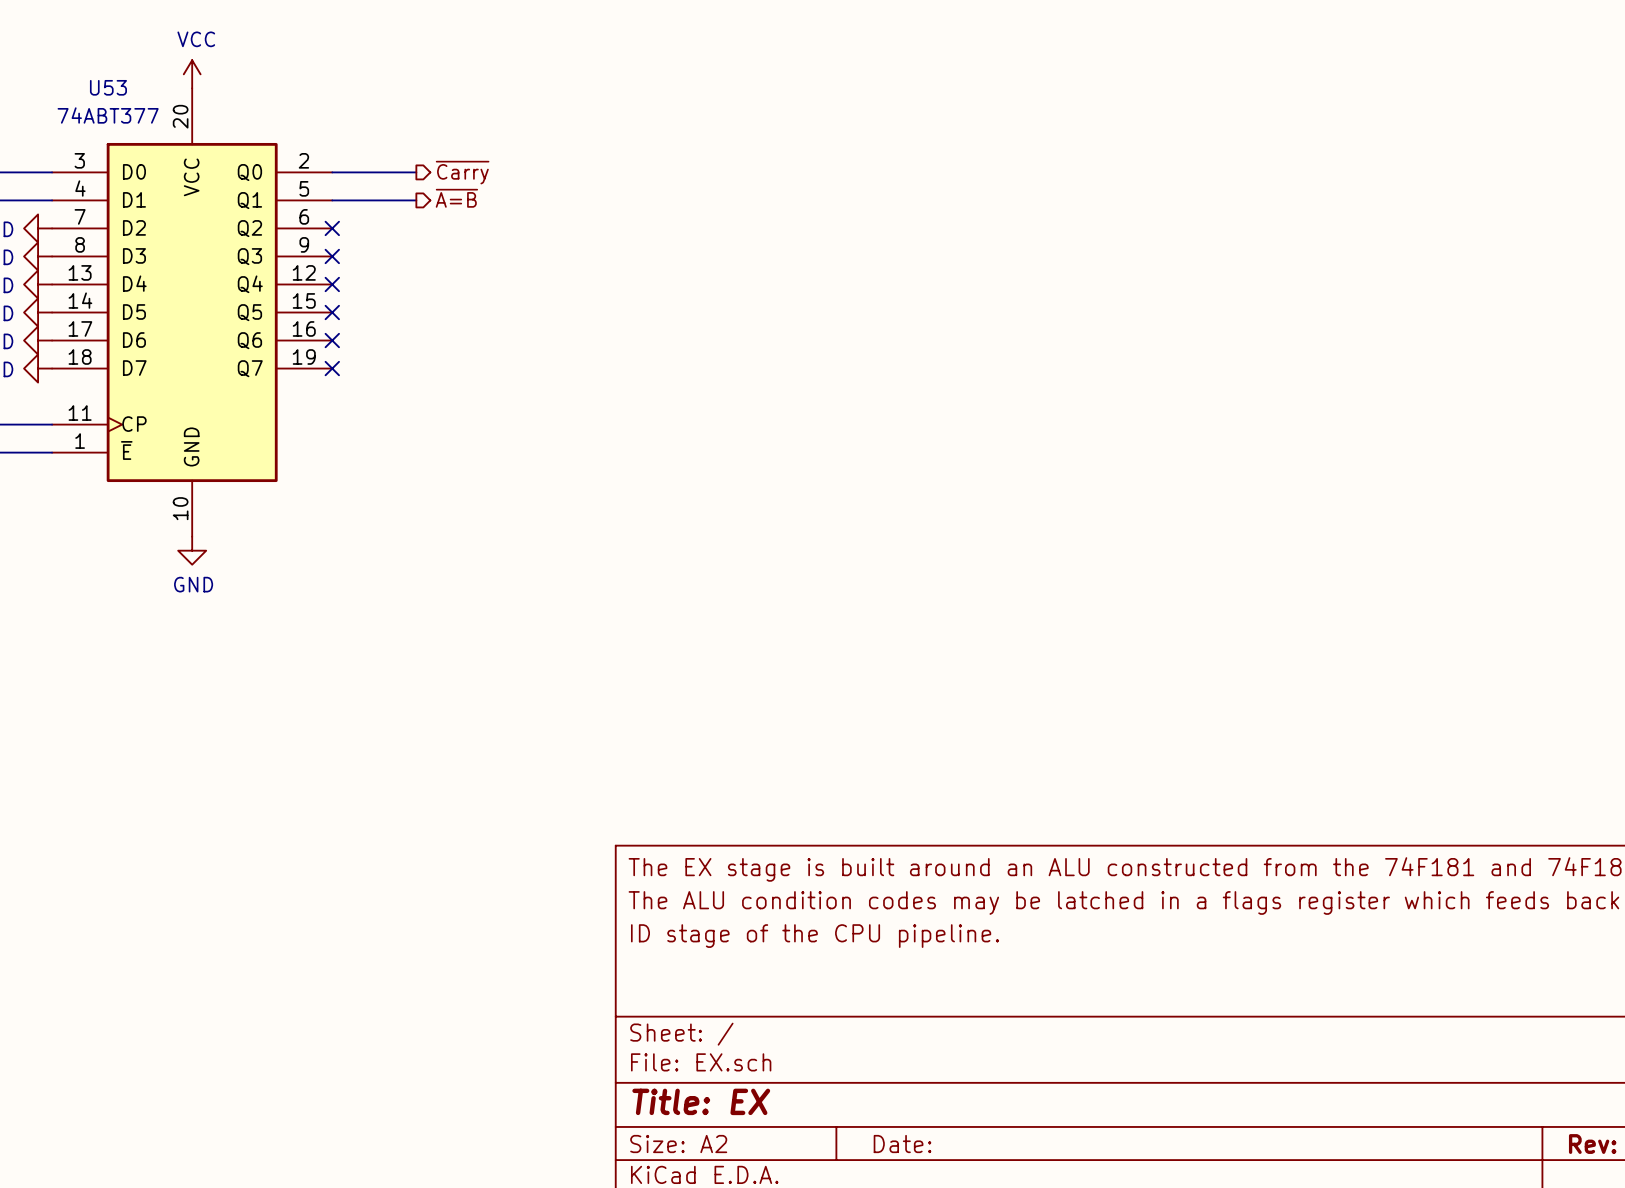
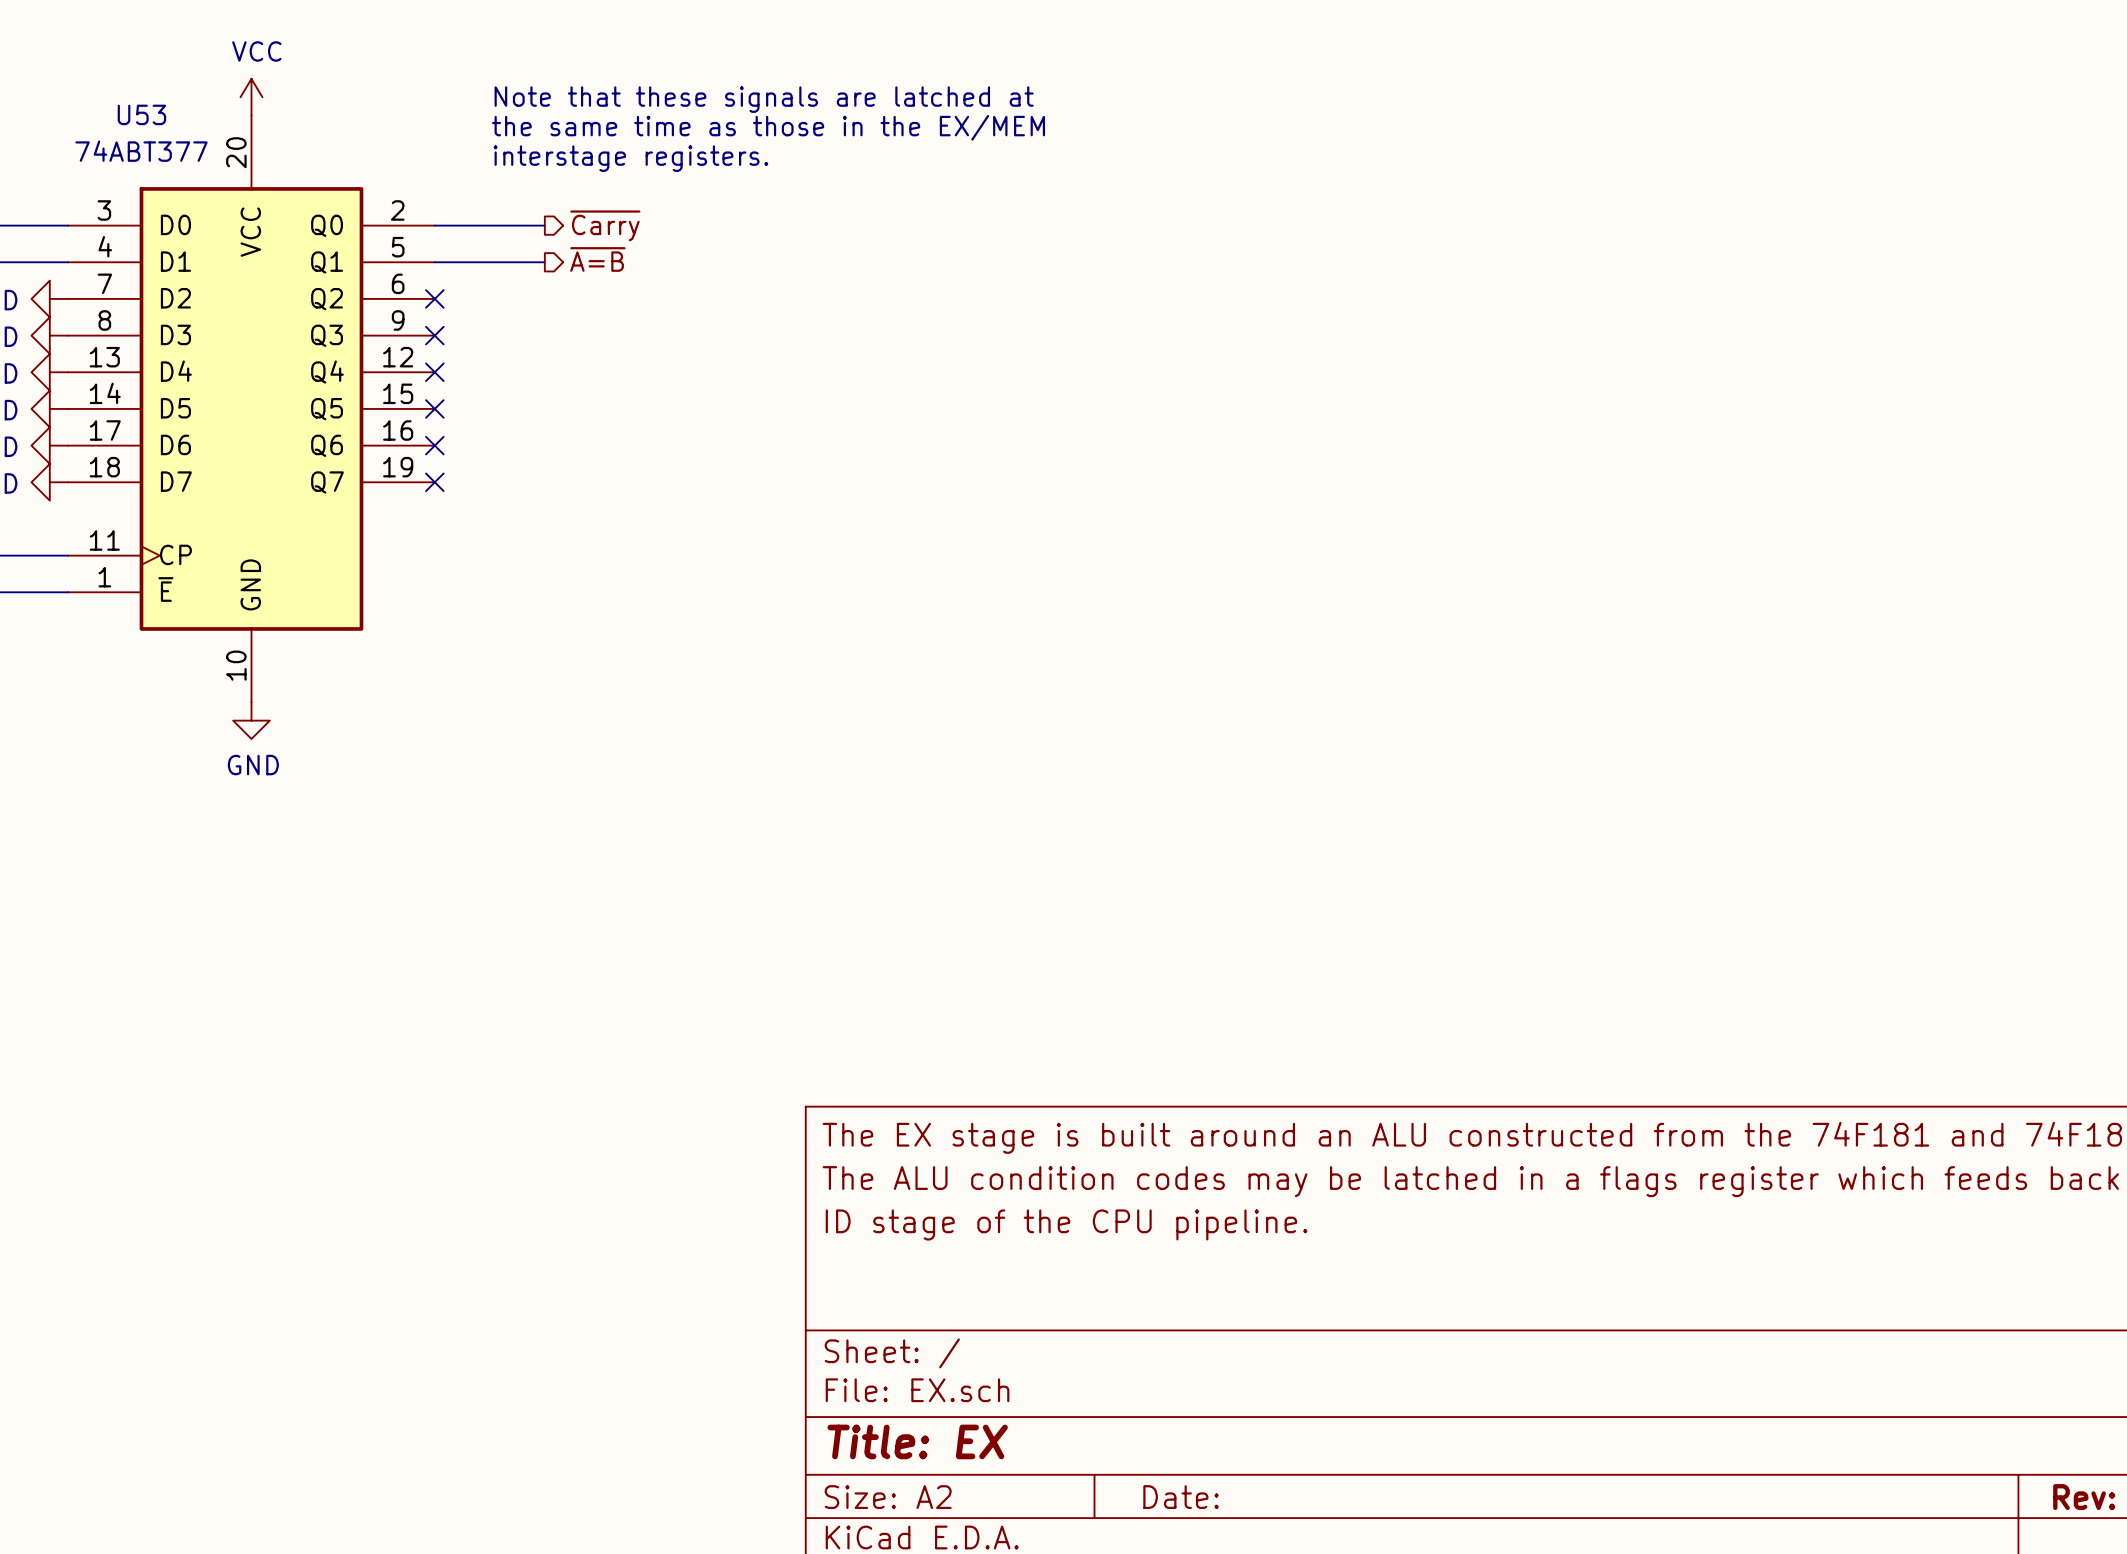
text: none -> Note that these signals are latched at (764, 99)
text: none -> the same time as those in the EX/MEM (768, 127)
text: none -> interstage registers. (630, 158)

